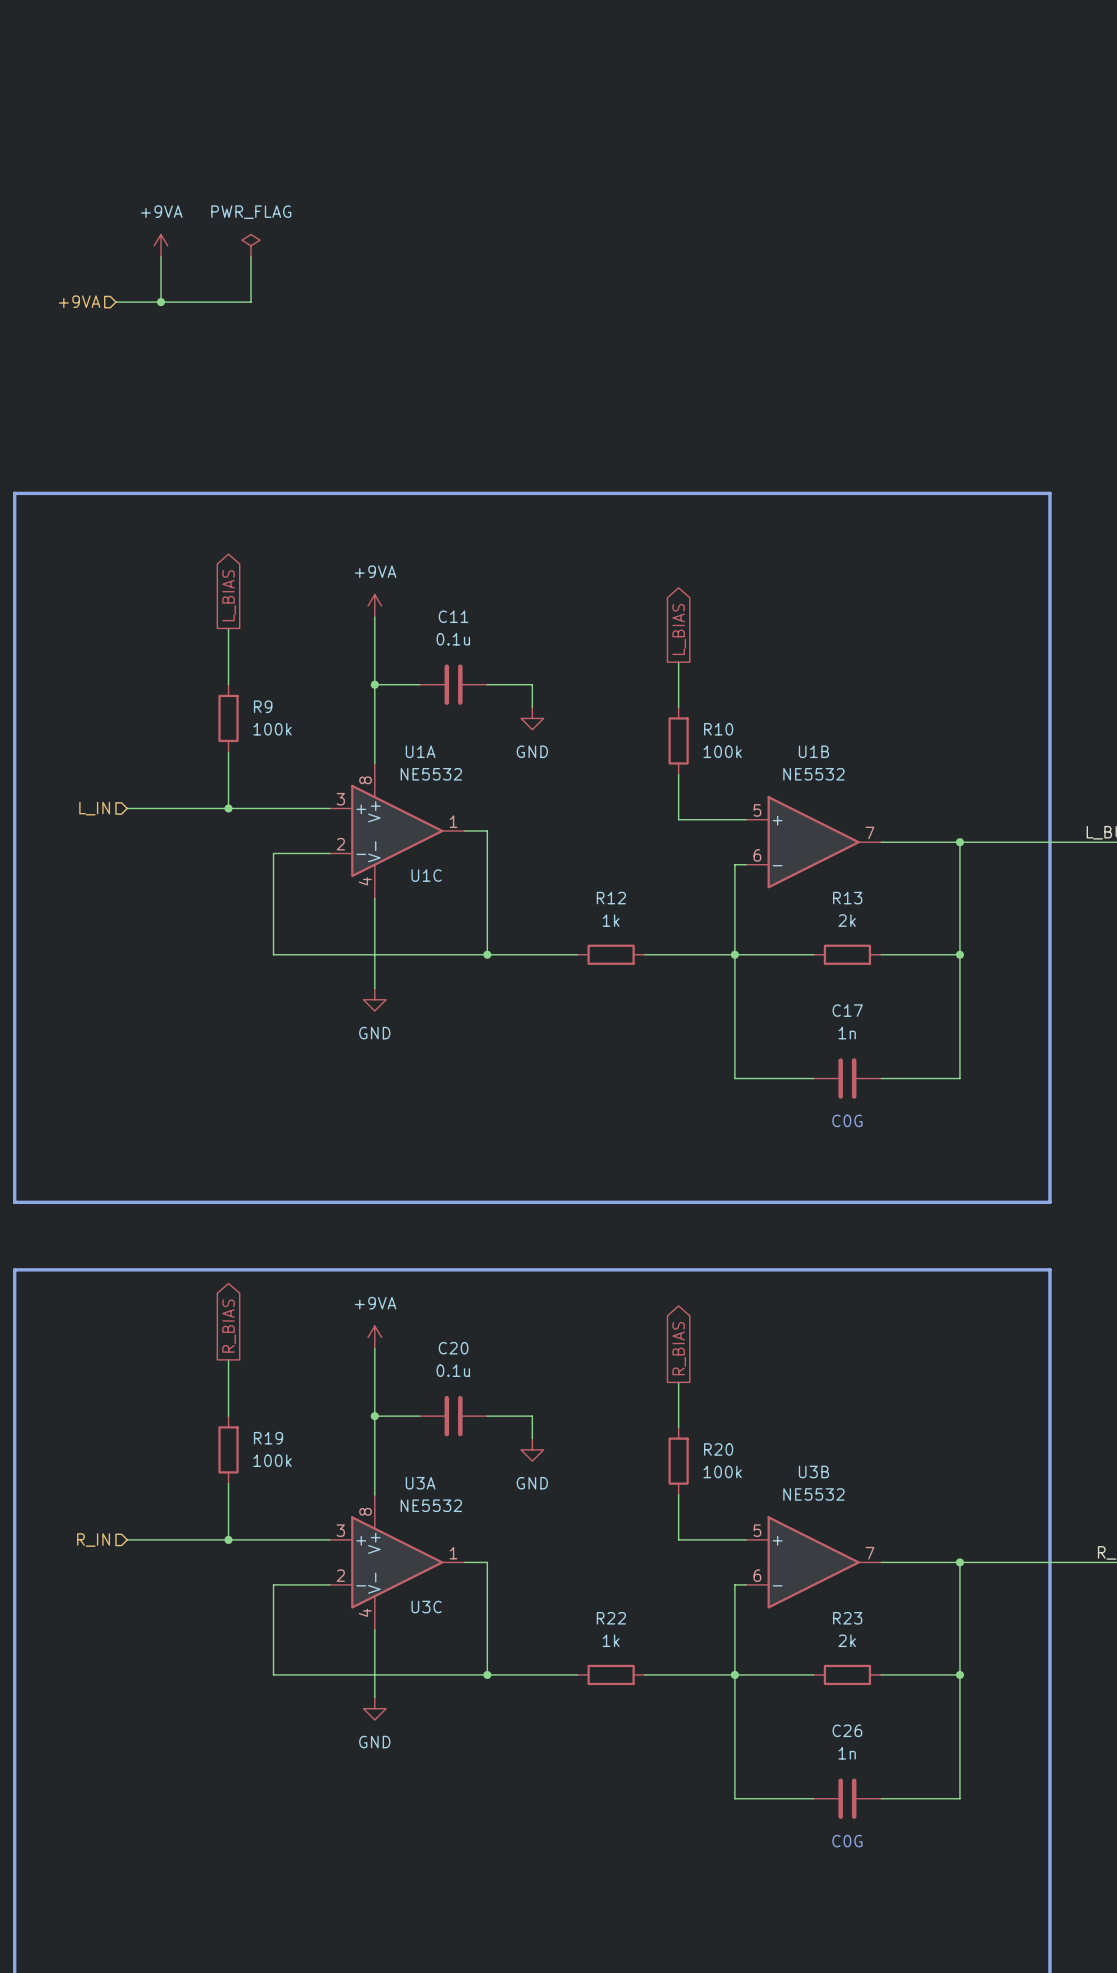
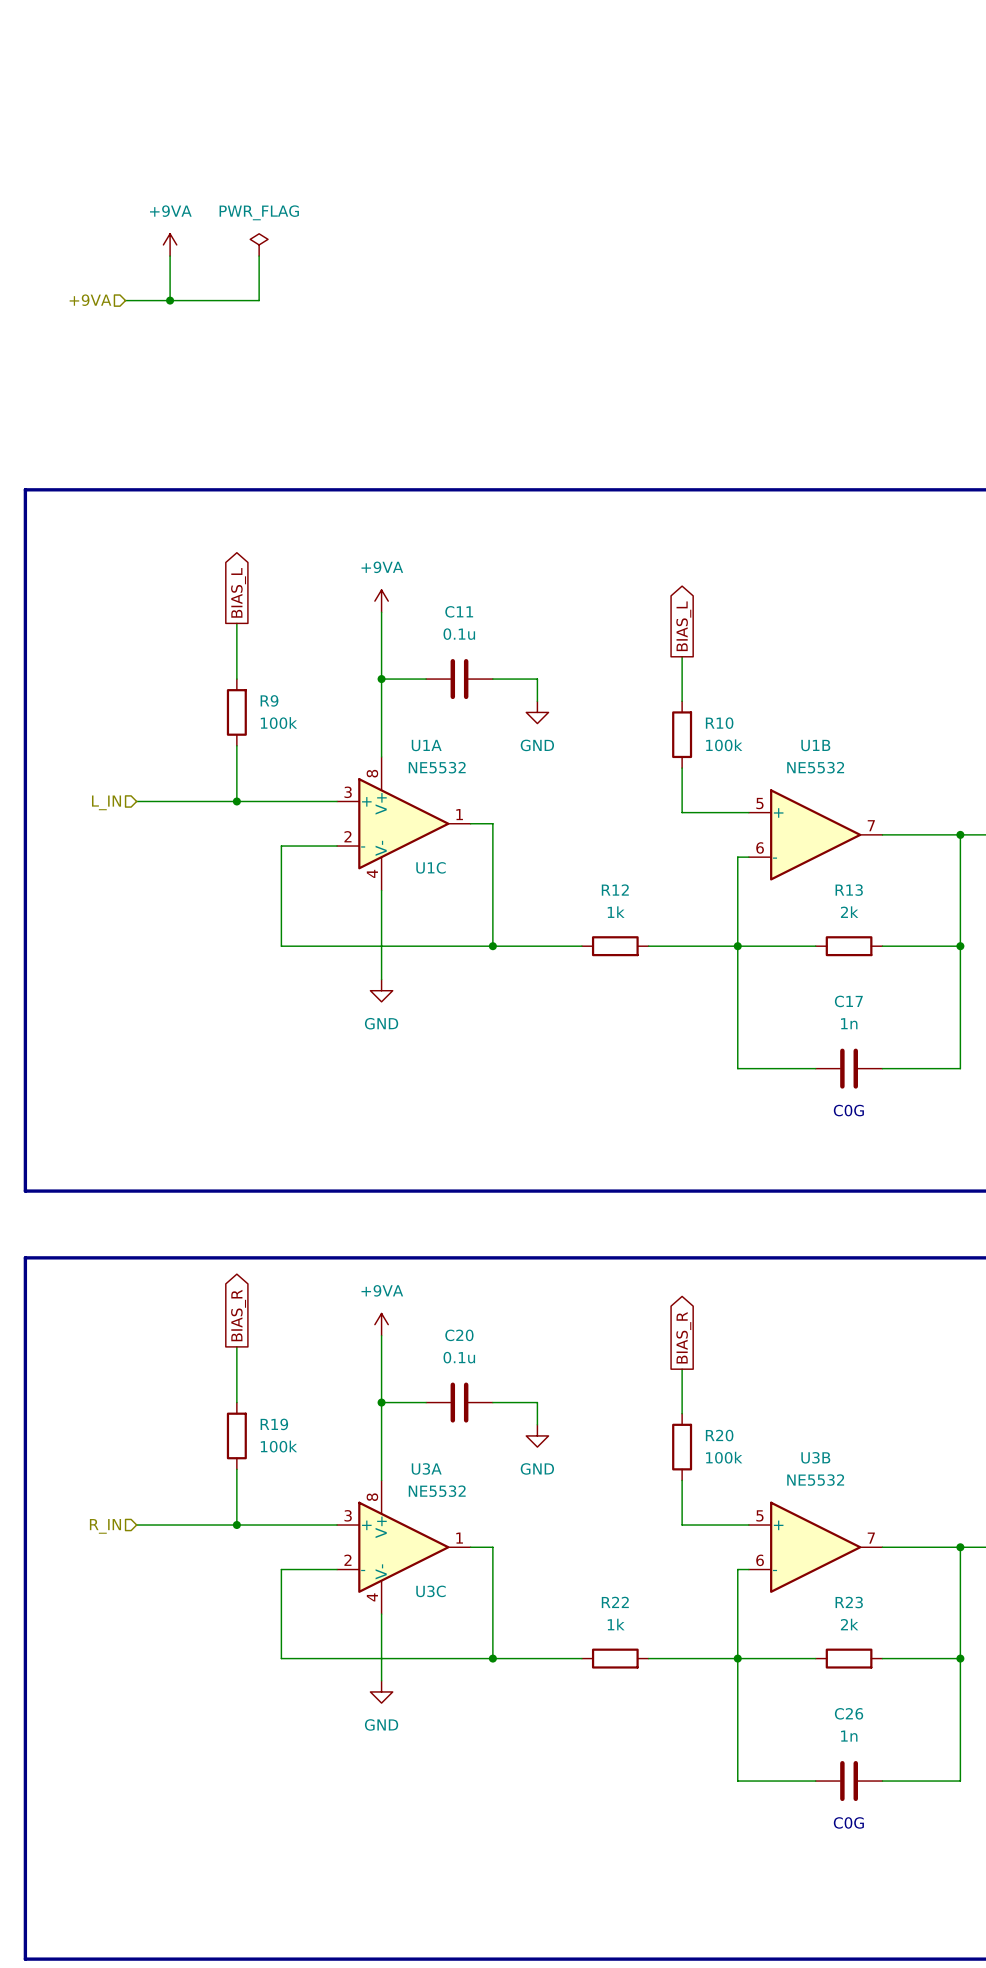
global label: L_BIAS (229, 595) -> BIAS_L (238, 592)
global label: L_BIAS (679, 629) -> BIAS_L (683, 626)
global label: R_BIAS (229, 1326) -> BIAS_R (238, 1315)
global label: R_BIAS (679, 1348) -> BIAS_R (683, 1337)

